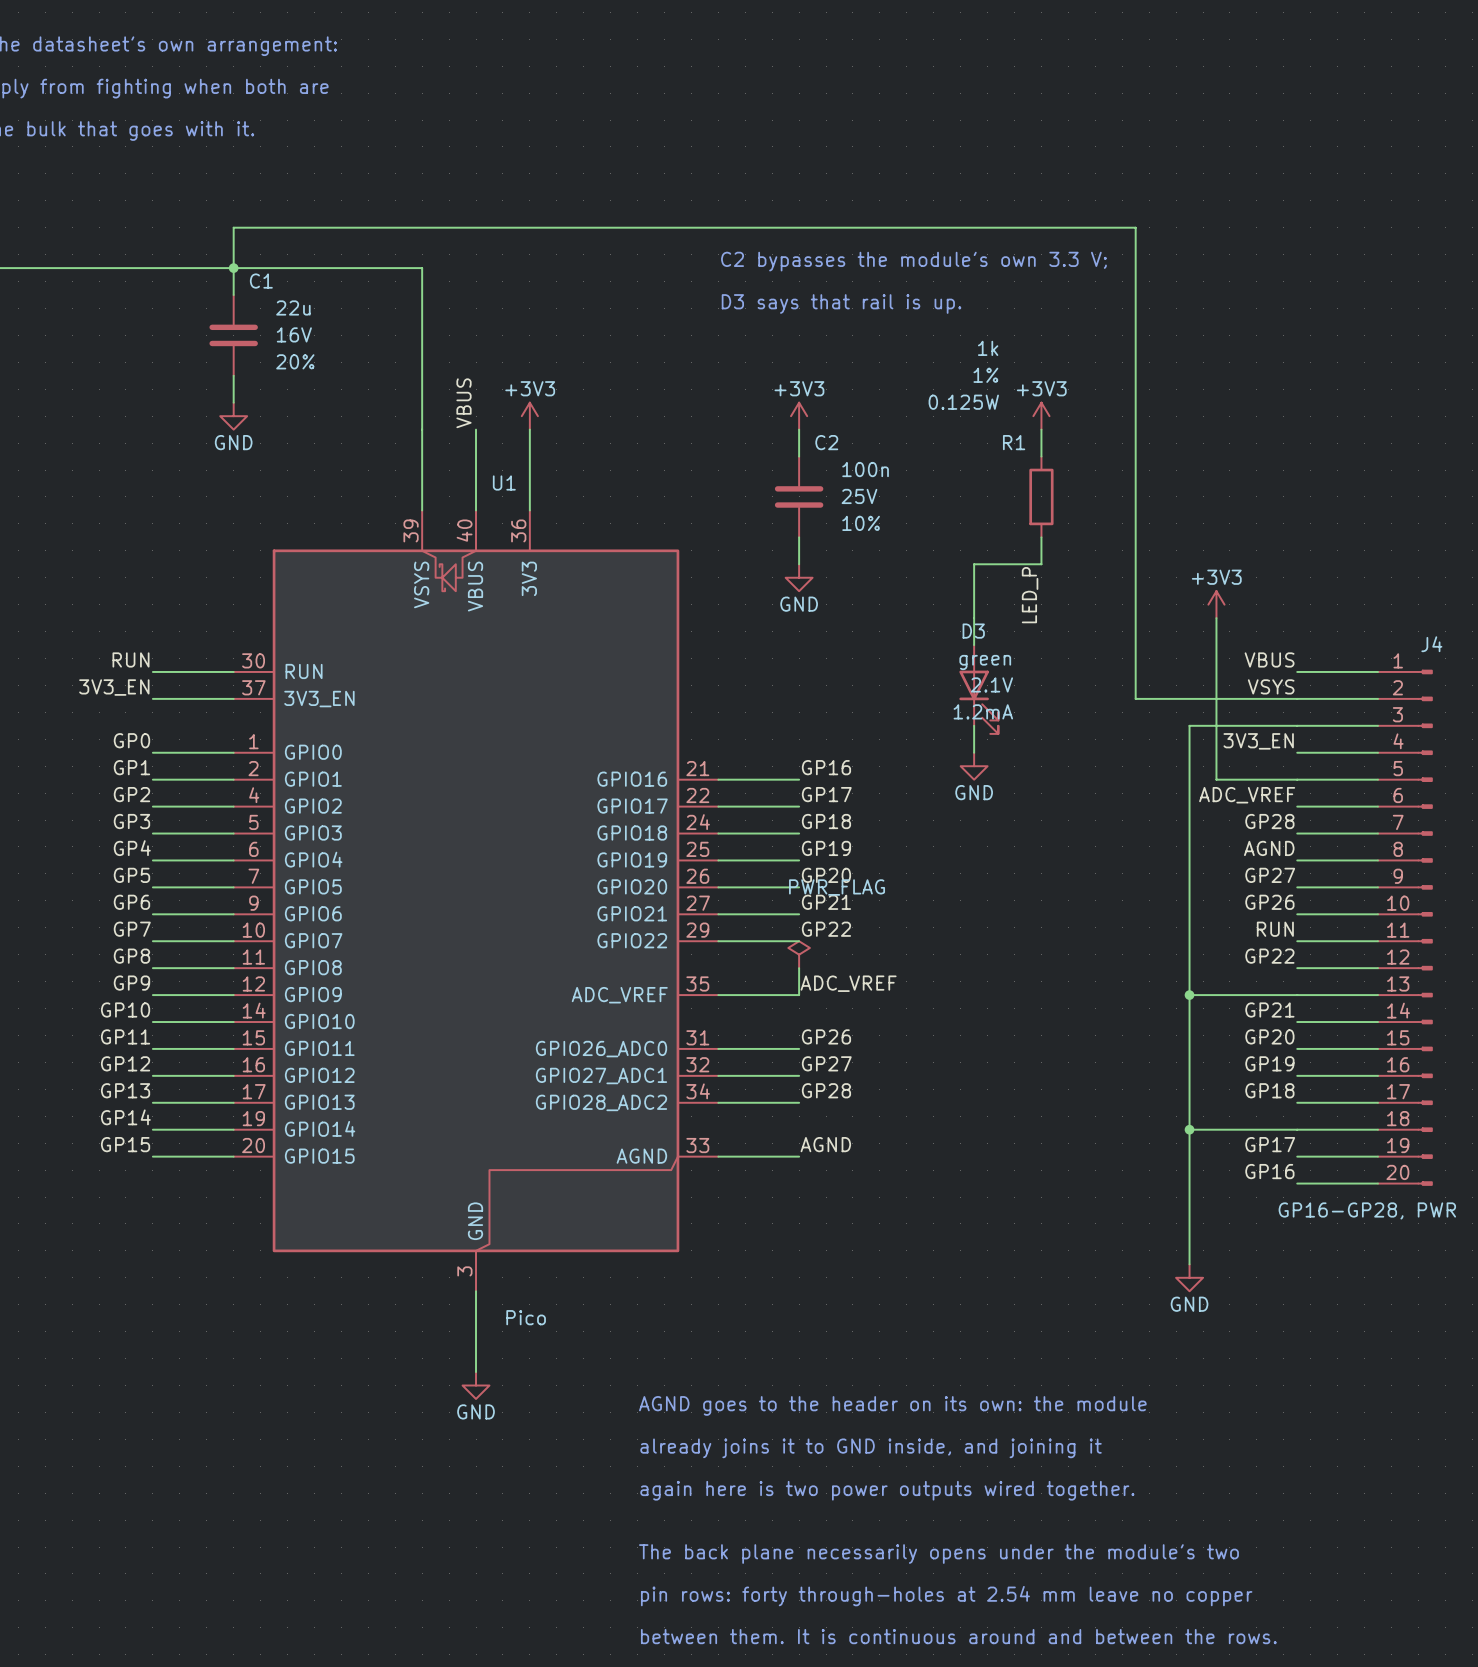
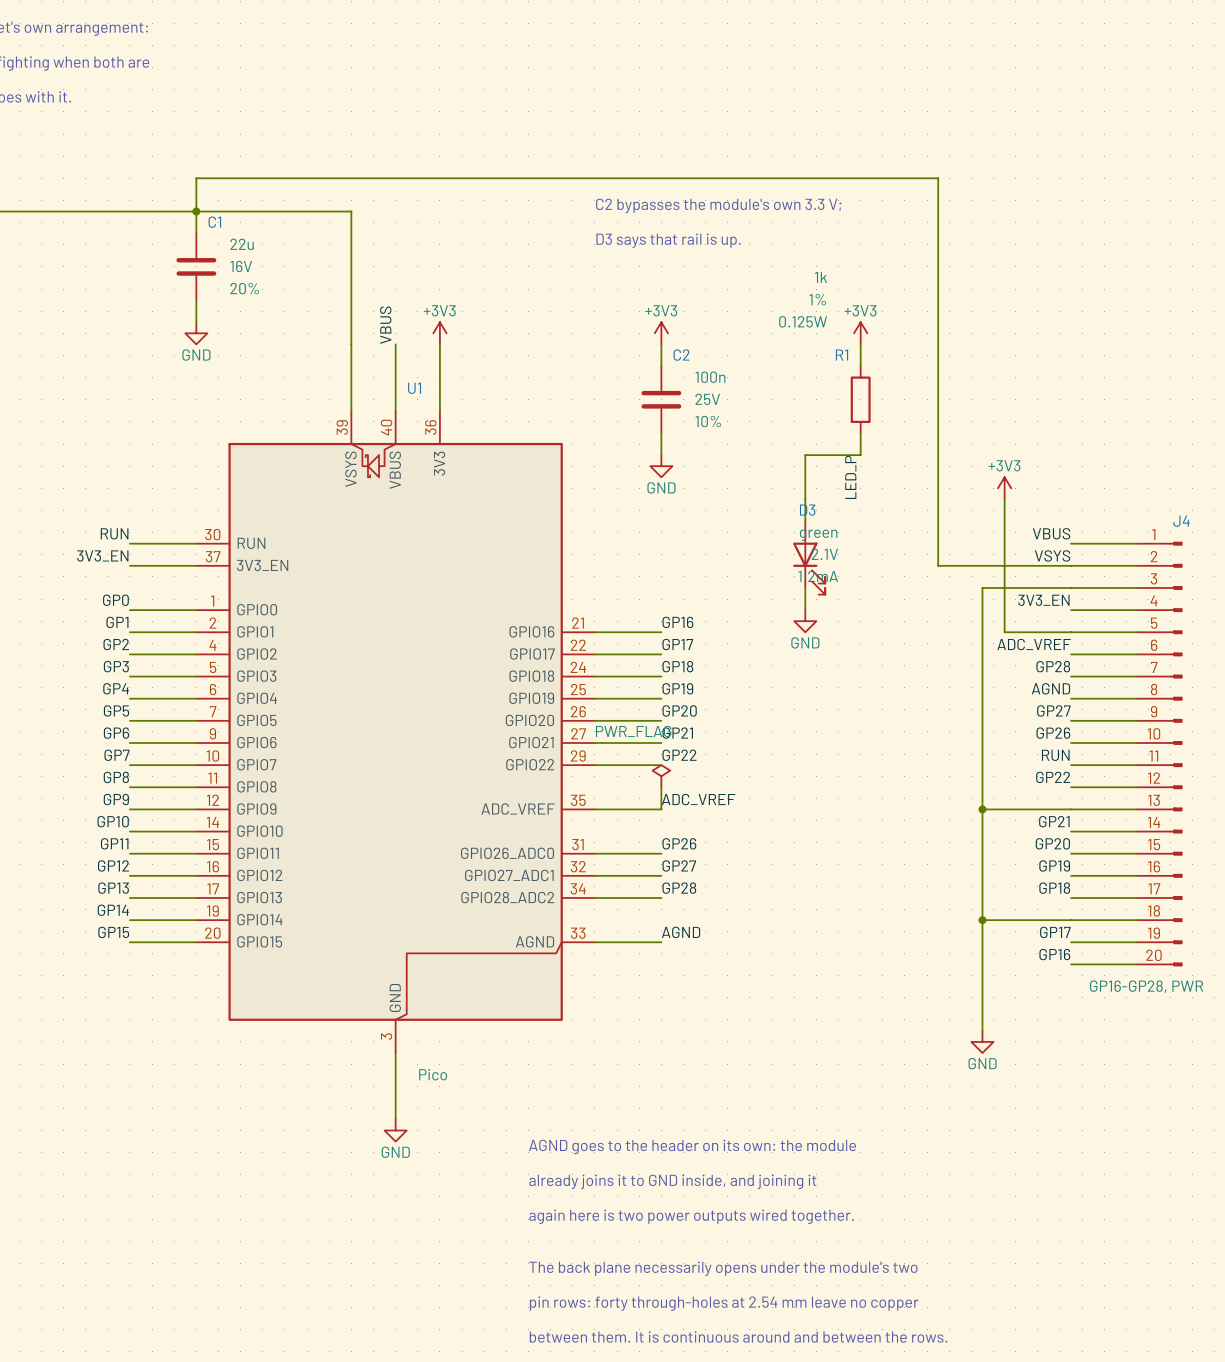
power symbol text position: PWR_FLAG (837, 887) -> PWR_FLAG (633, 731)

